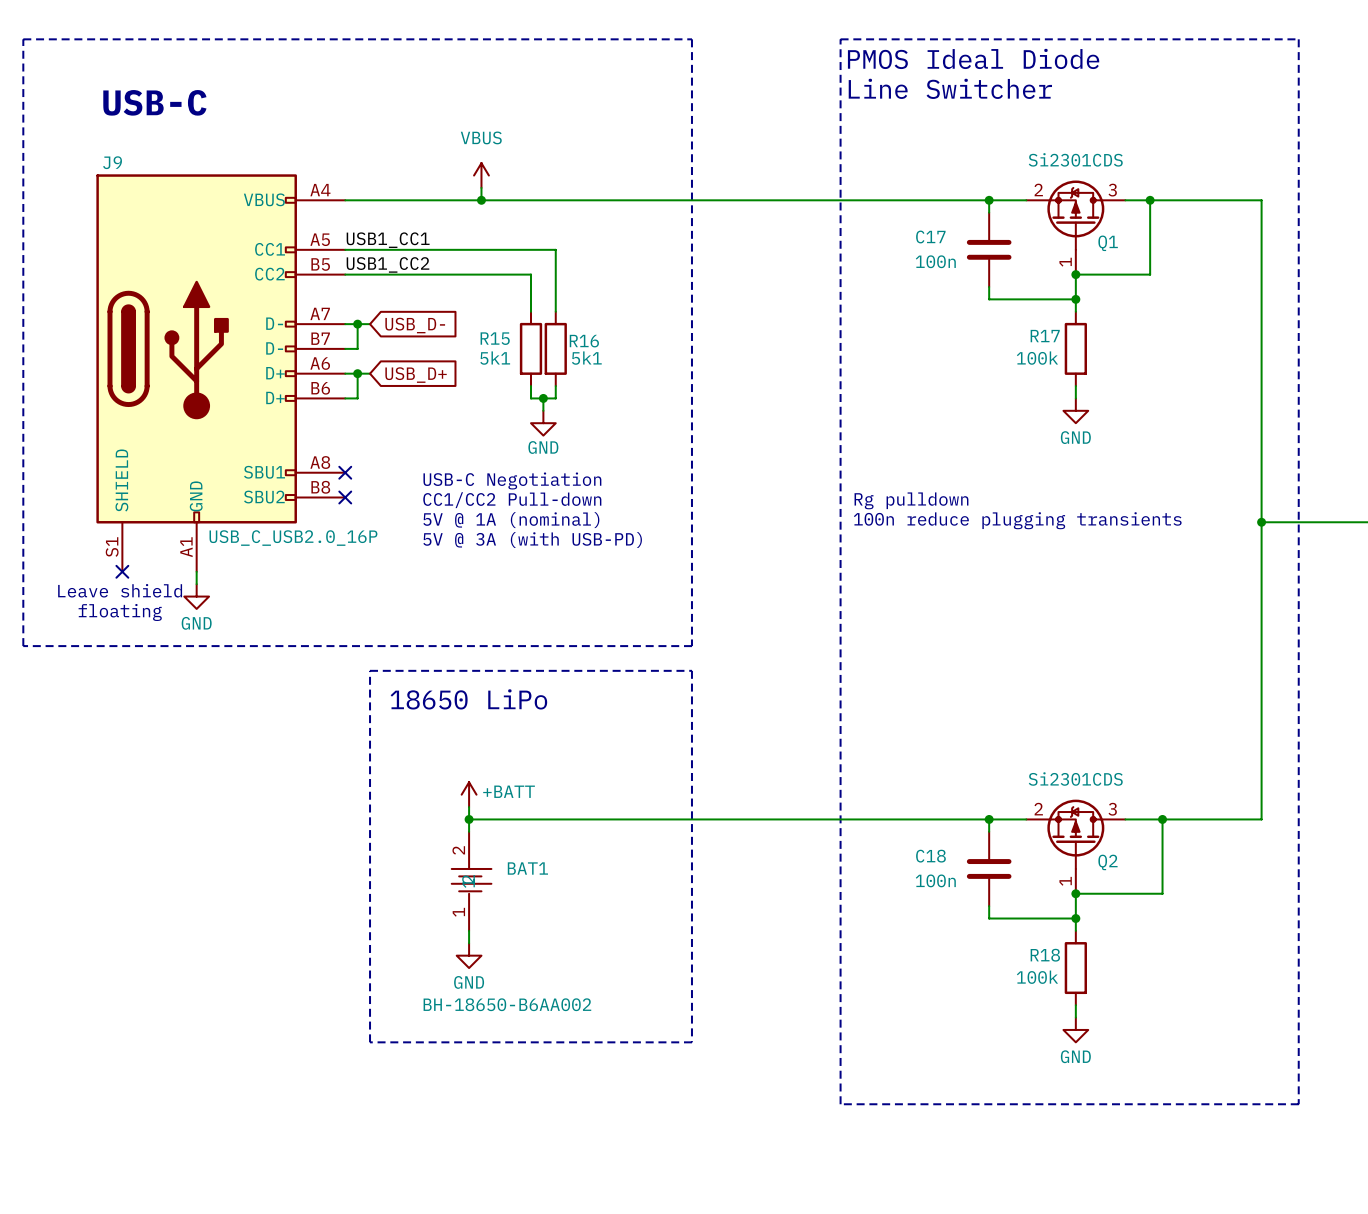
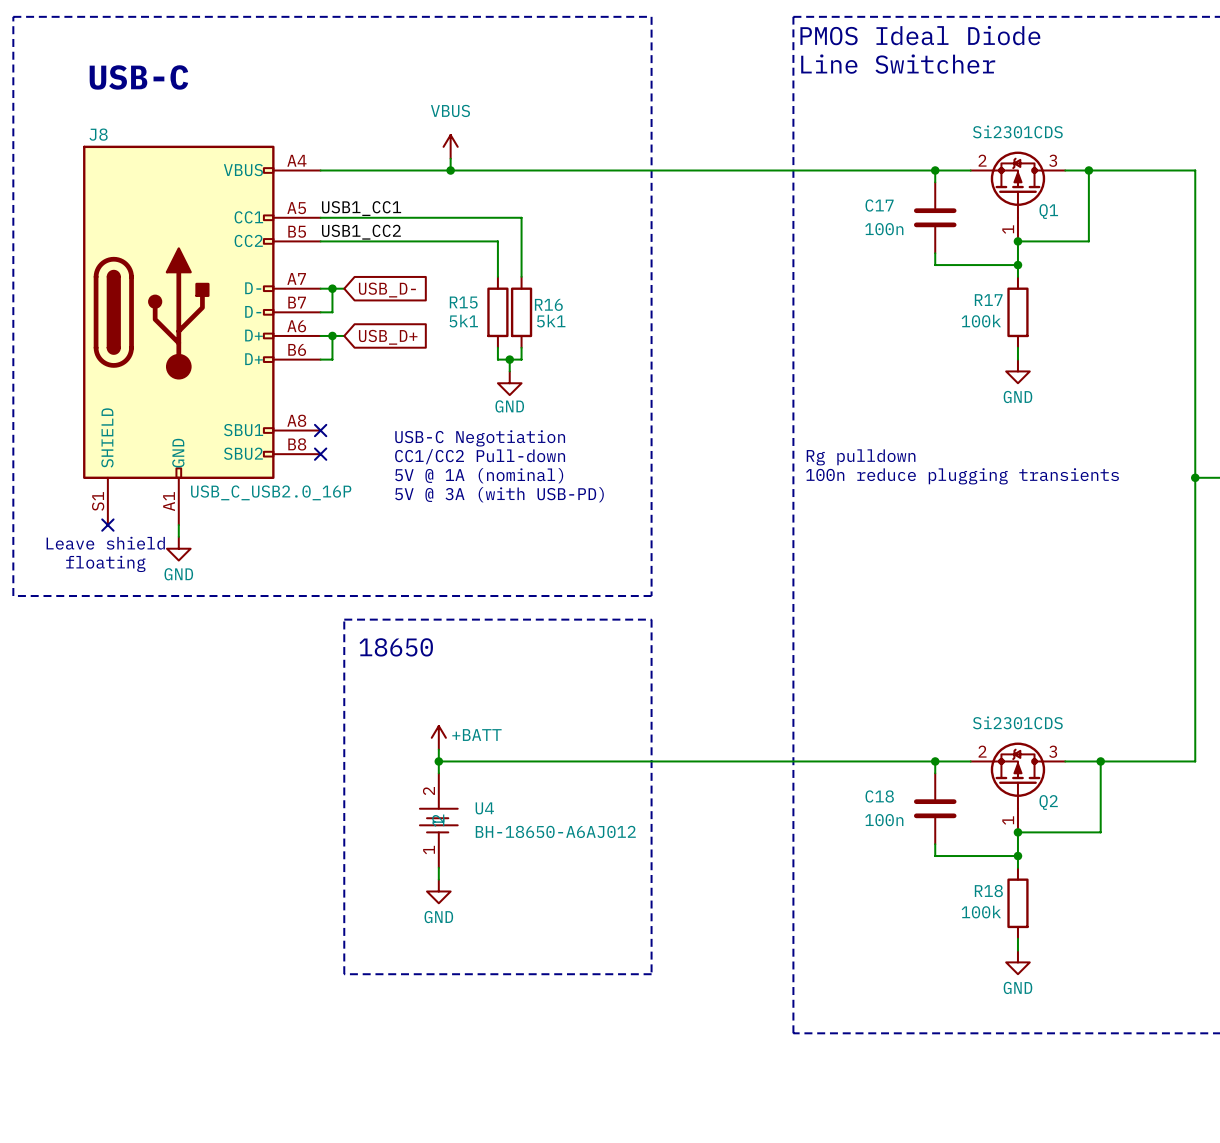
J9 name: J9 (112, 162) -> J8 (98, 134)
text: 18650 LiPo (468, 699) -> 18650 (396, 647)
U4: none -> BH-18650-A6AJ012 (438, 820)
BAT1: BH-18650-B6AA002 (471, 881) -> none

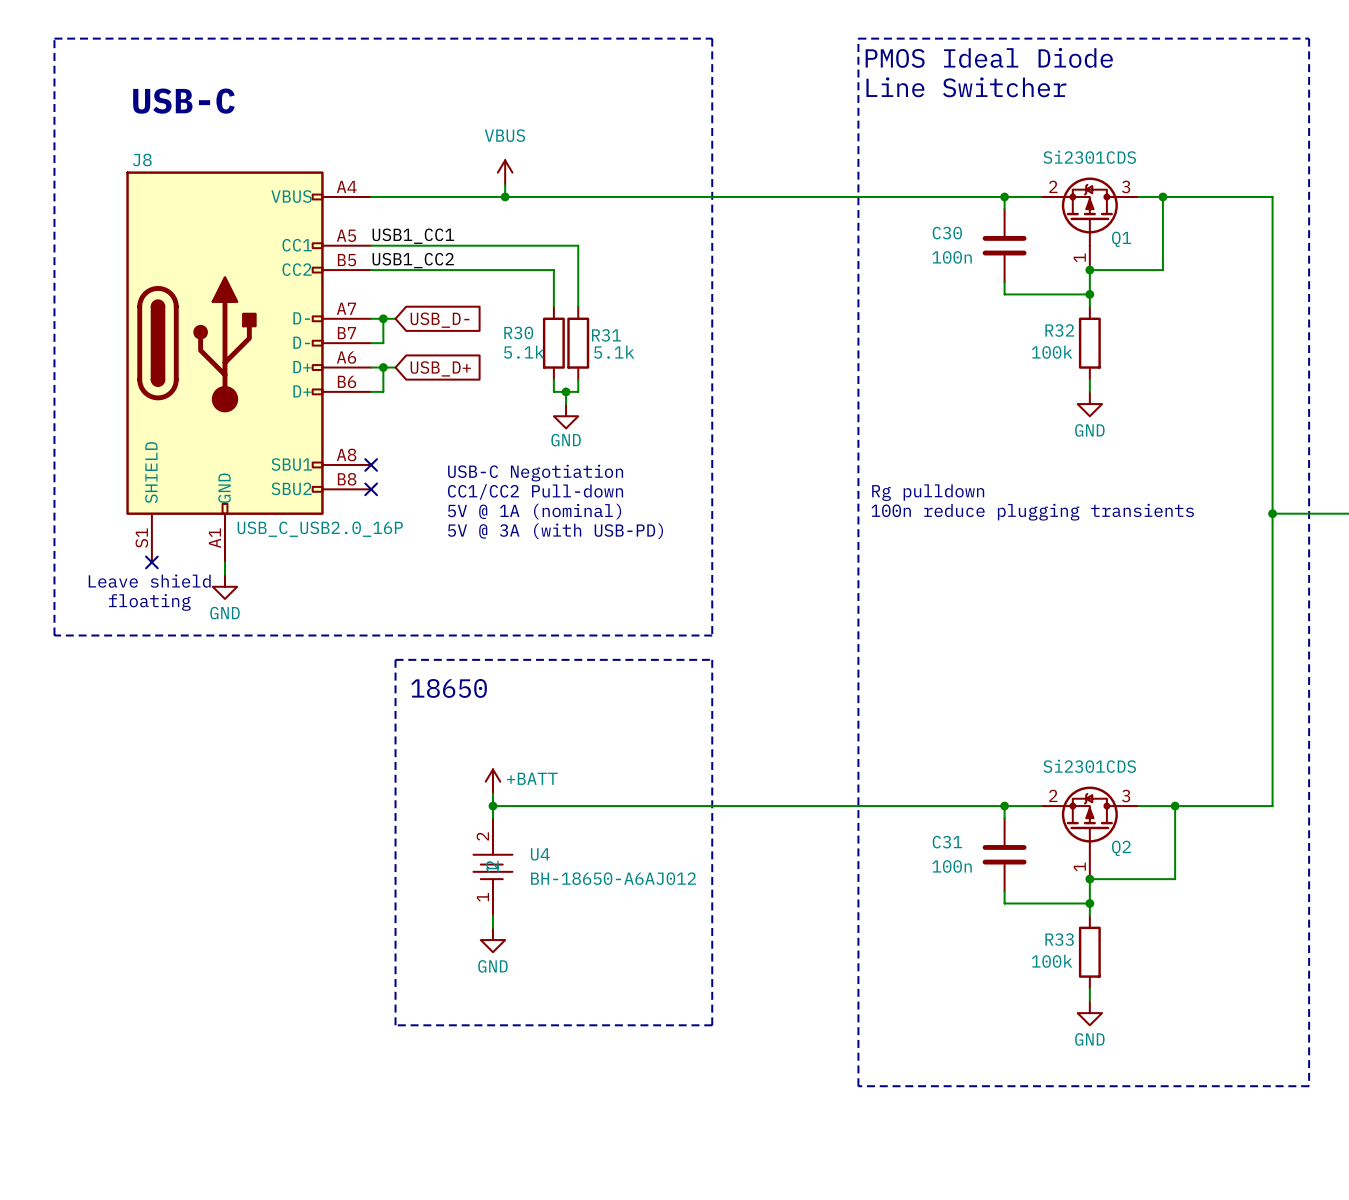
C17 name: C17 (879, 205) -> C30 (947, 233)
R17 name: R17 (988, 300) -> R32 (1059, 330)
R15 name: R15 (463, 302) -> R30 (518, 332)
R16 name: R16 (548, 304) -> R31 (606, 335)
R15 value: 5k1 (463, 321) -> 5.1k (524, 352)
R16 value: 5k1 (551, 321) -> 5.1k (614, 352)
C18 name: C18 (879, 796) -> C31 (947, 842)
R18 name: R18 (988, 891) -> R33 (1059, 939)

